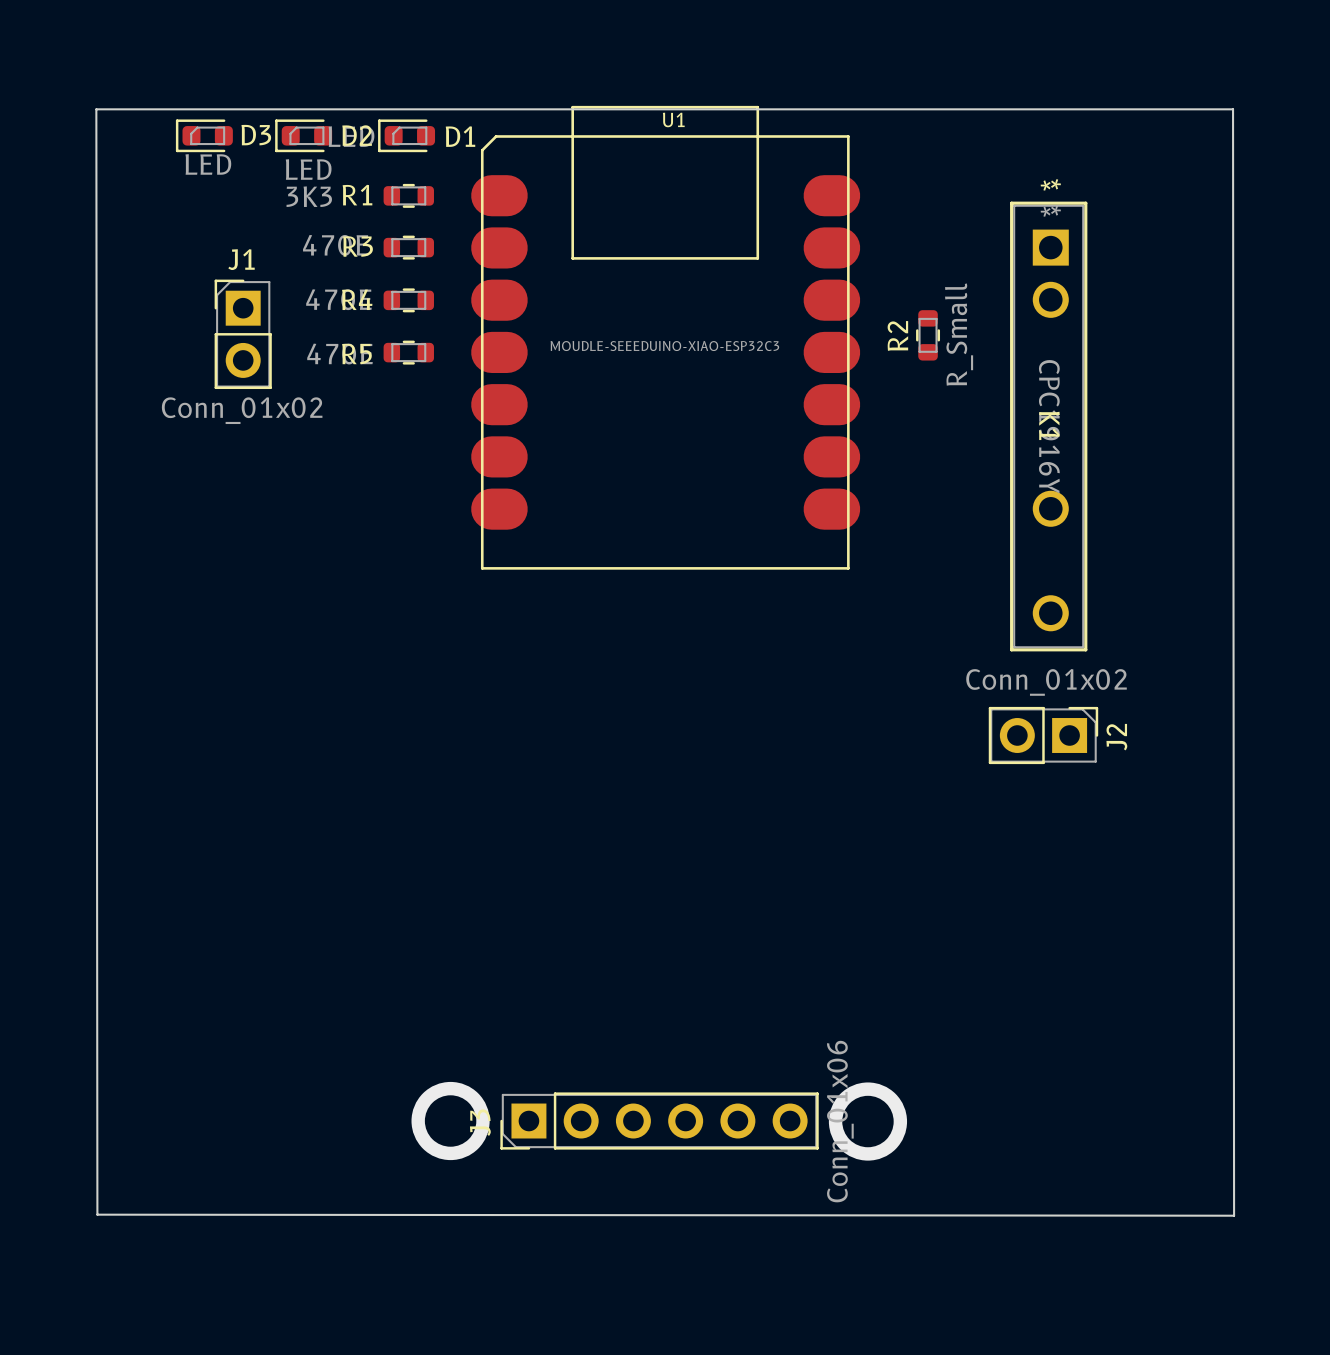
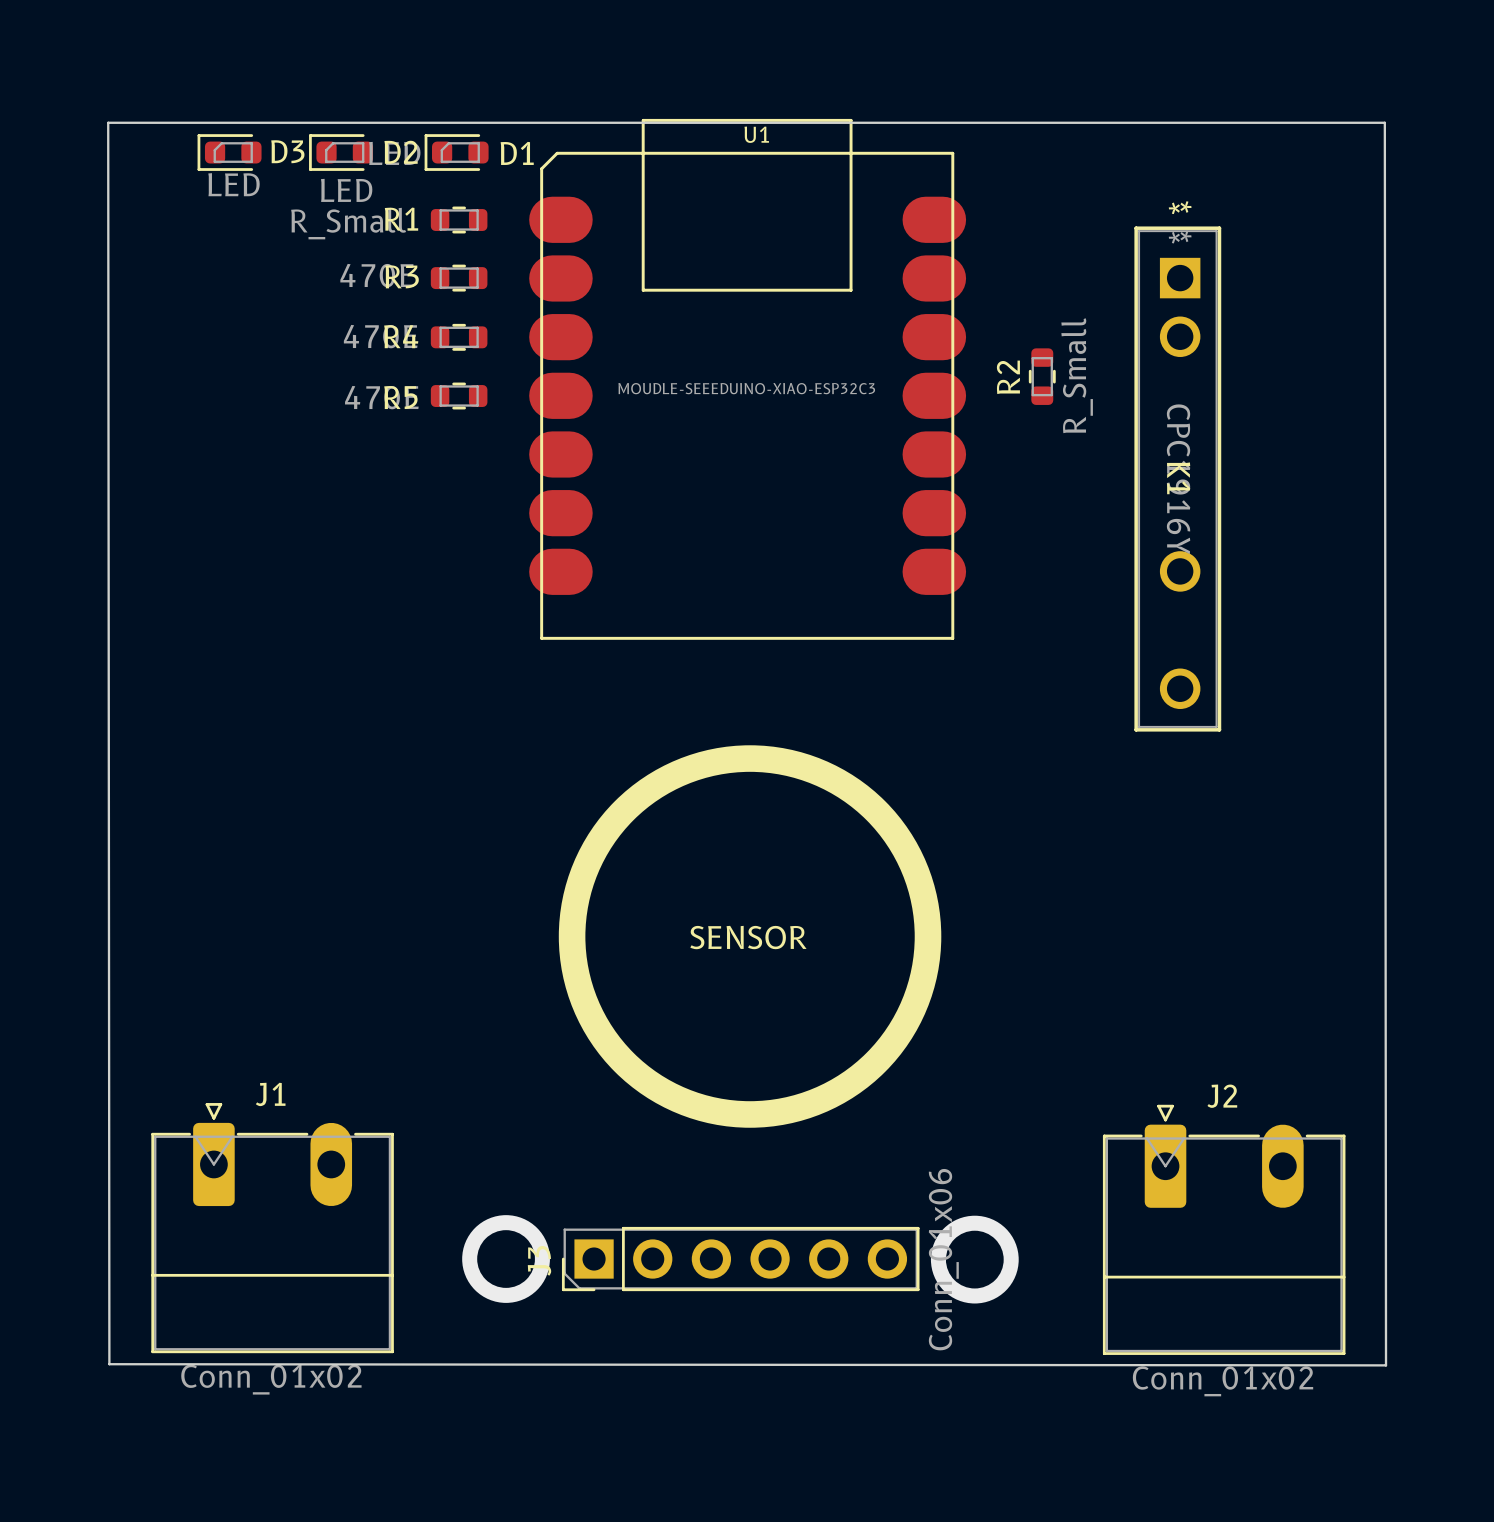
R1 value: 3K3 (309, 196) -> R_Small (348, 223)
J1 name position: J1 (241, 259) -> J1 (270, 1094)
J1 footprint: [214, 279, 272, 390] -> [151, 1103, 394, 1354]
J1 value position: Conn_01x02 (242, 410) -> Conn_01x02 (271, 1379)
drawing: none -> [558, 745, 942, 1128]
J2 value position: Conn_01x02 (1046, 682) -> Conn_01x02 (1223, 1381)
J2 footprint: [988, 706, 1099, 765] -> [1102, 1104, 1346, 1355]
J2 name position: J2 (1116, 737) -> J2 (1222, 1096)
text: none -> SENSOR (748, 937)

